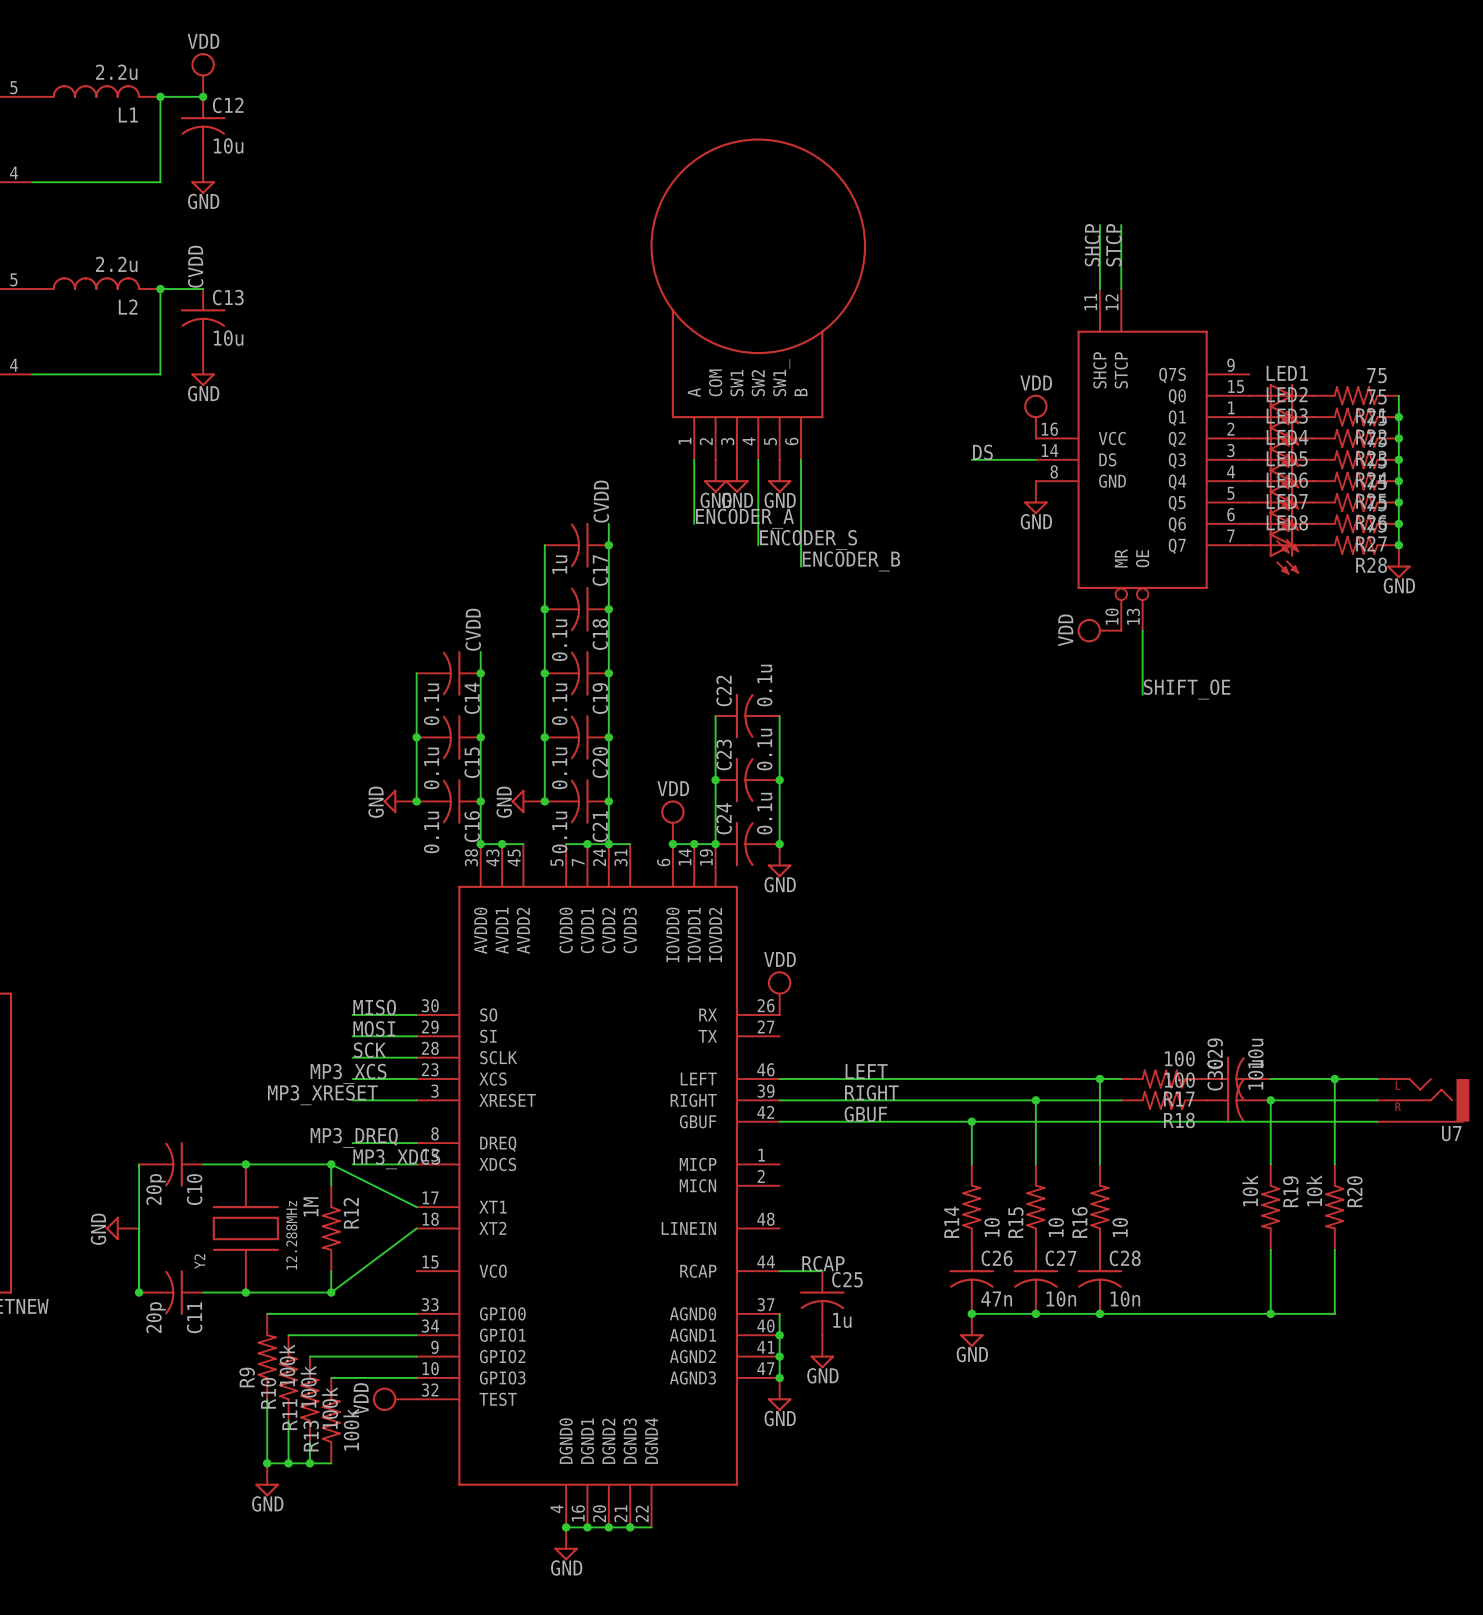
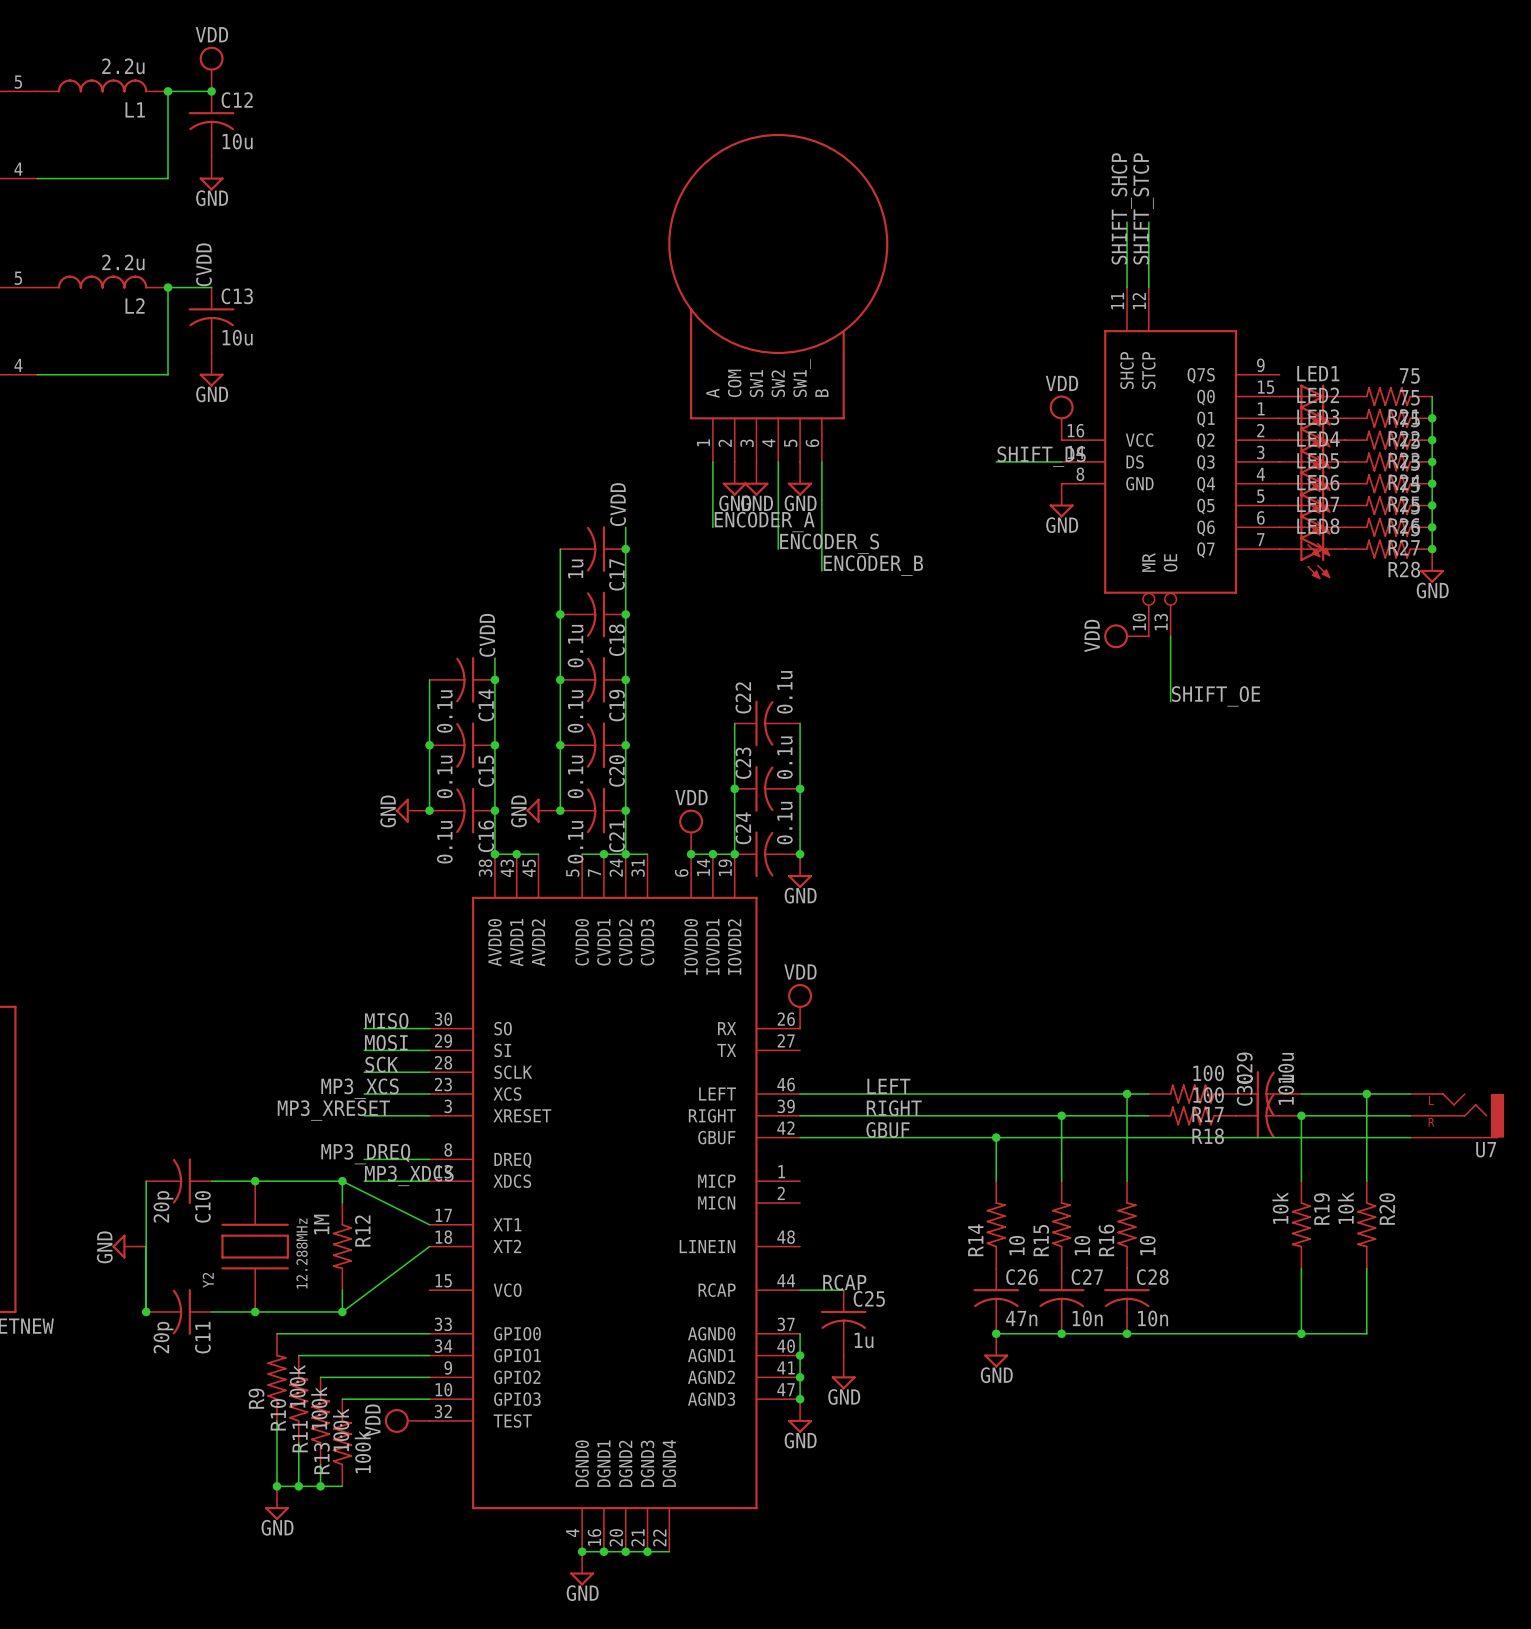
label: SHCP (1092, 245) -> SHIFT_SHCP (1121, 208)
label: STCP (1113, 245) -> SHIFT_STCP (1143, 208)
label: DS (982, 452) -> SHIFT_DS (1041, 456)

